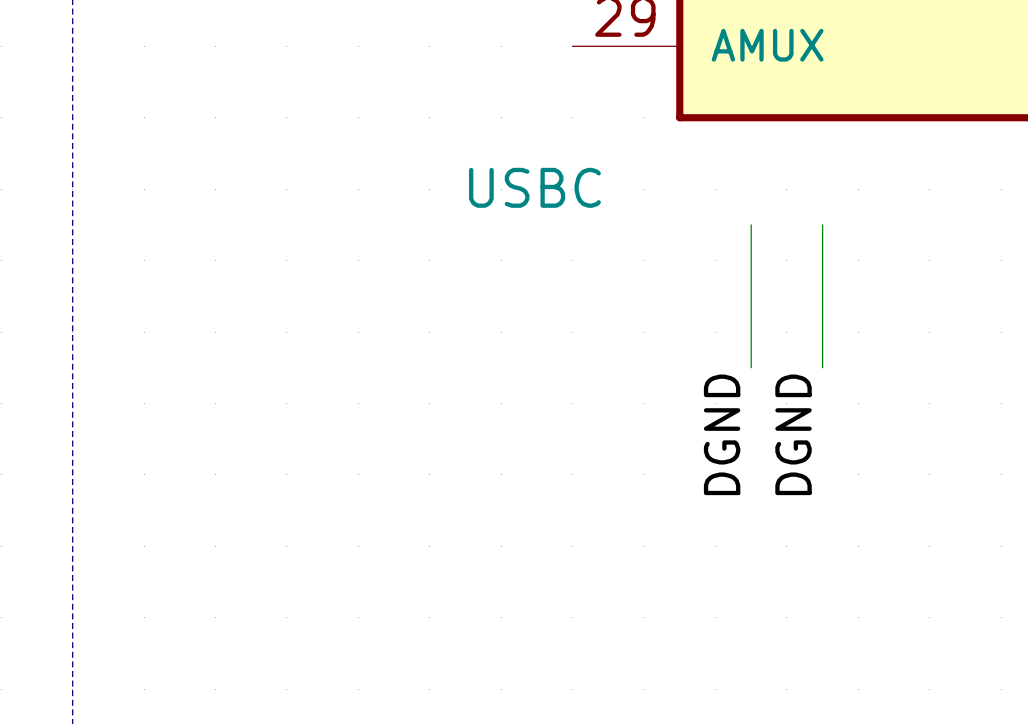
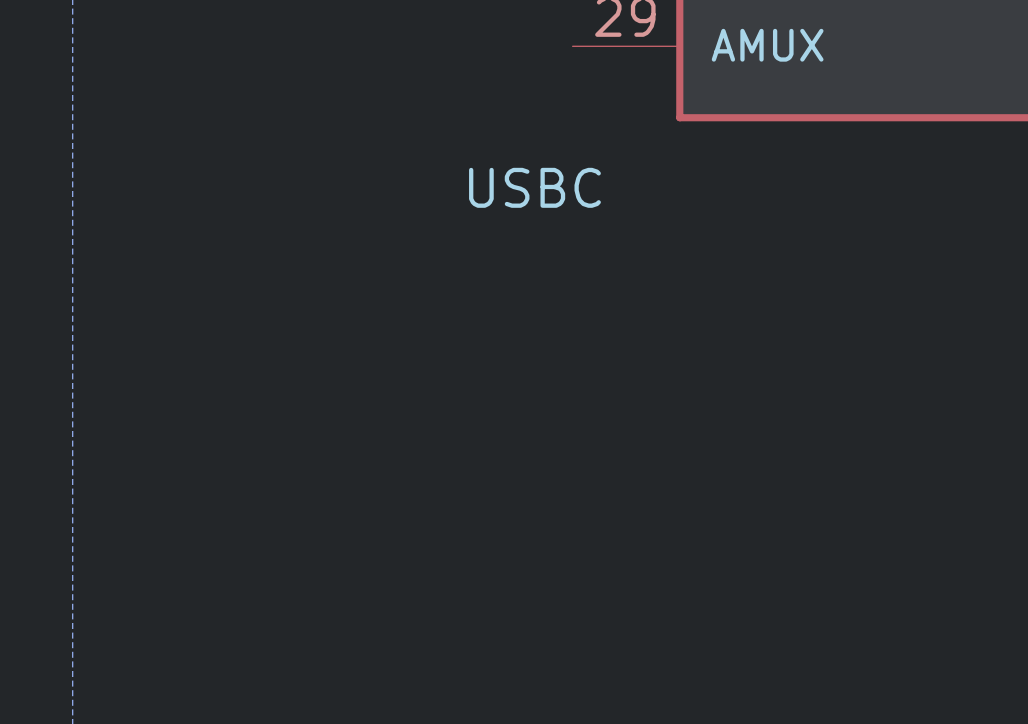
wire: (751, 224) (751, 367) -> none
wire: (822, 224) (822, 367) -> none
label: DGND (722, 434) -> none
label: DGND (793, 434) -> none

